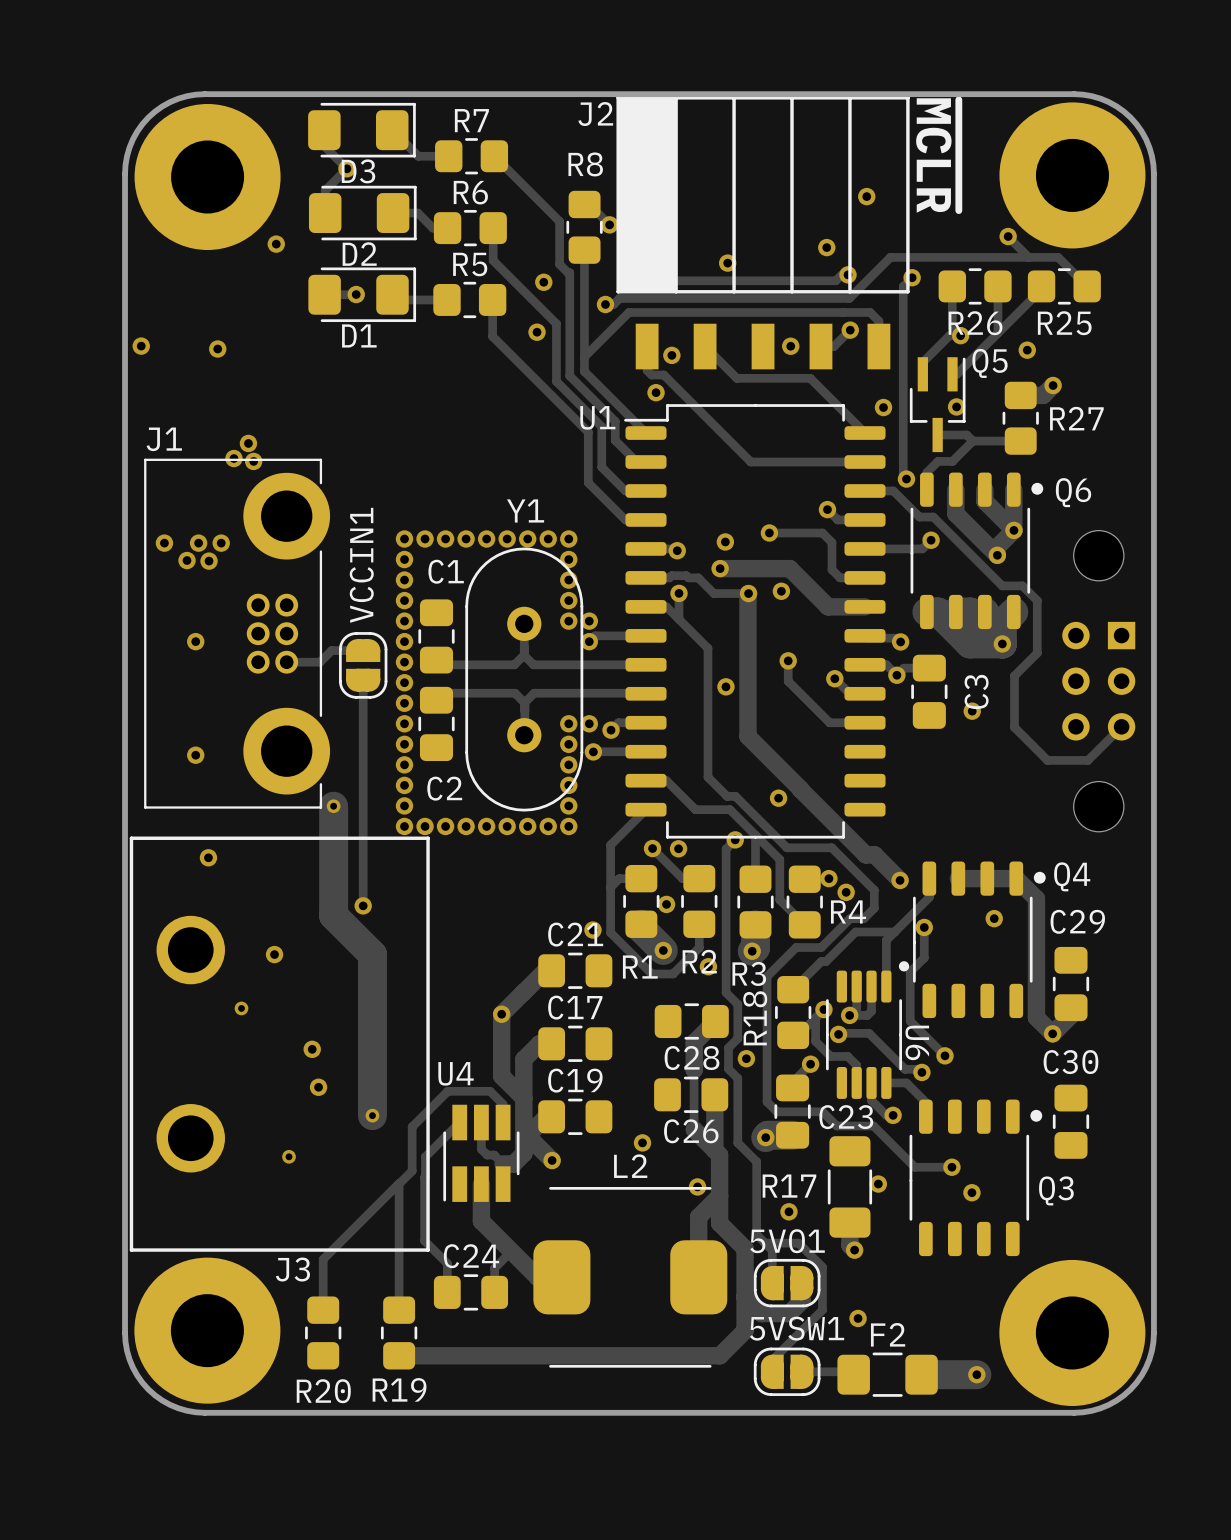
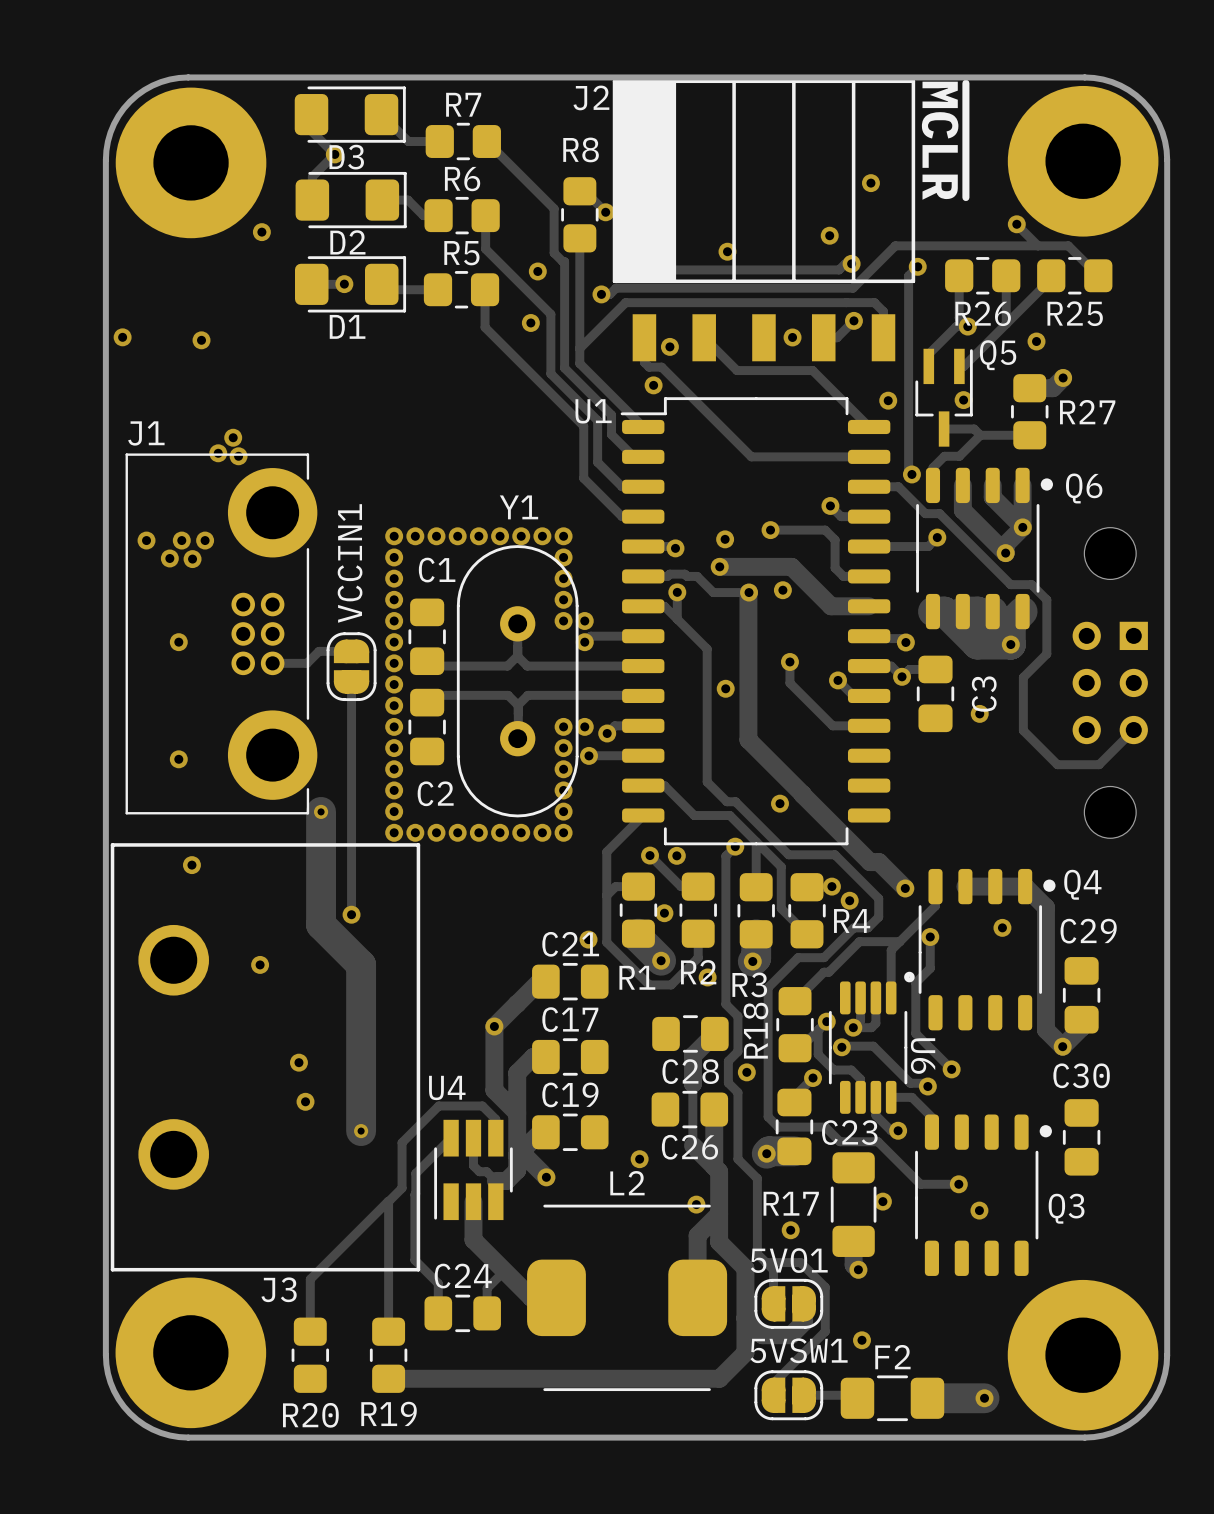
via: (241, 1008) -> none
via: (289, 1156) -> none

